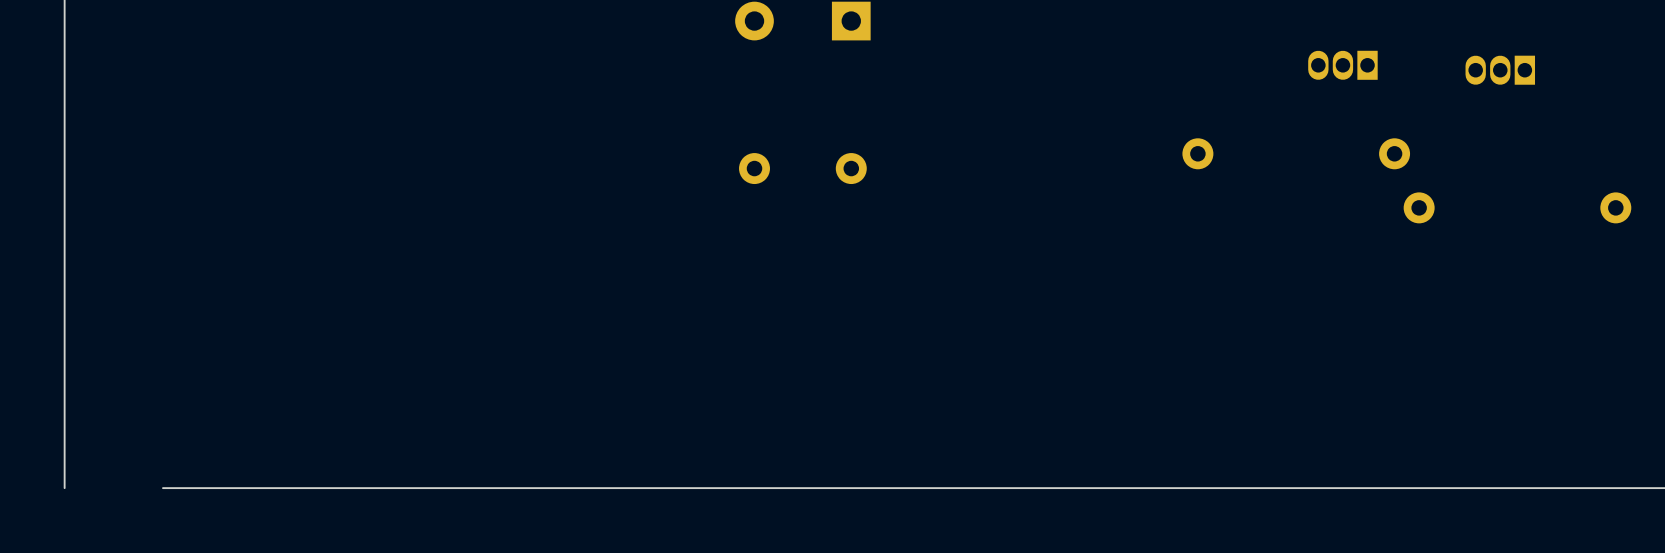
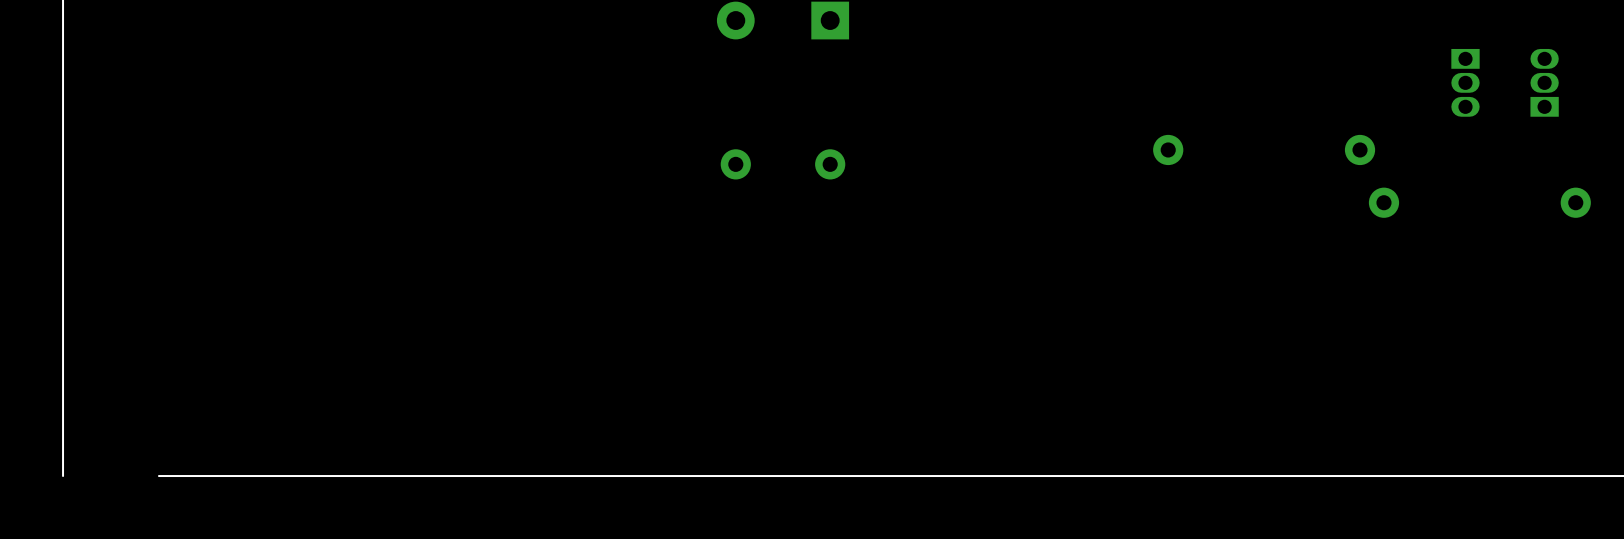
part rotation: 0° (1342, 65) -> 90° clockwise (1544, 82)
part position: (1342, 65) -> (1544, 82)
part rotation: 0° (1500, 70) -> 90° counterclockwise (1465, 82)

